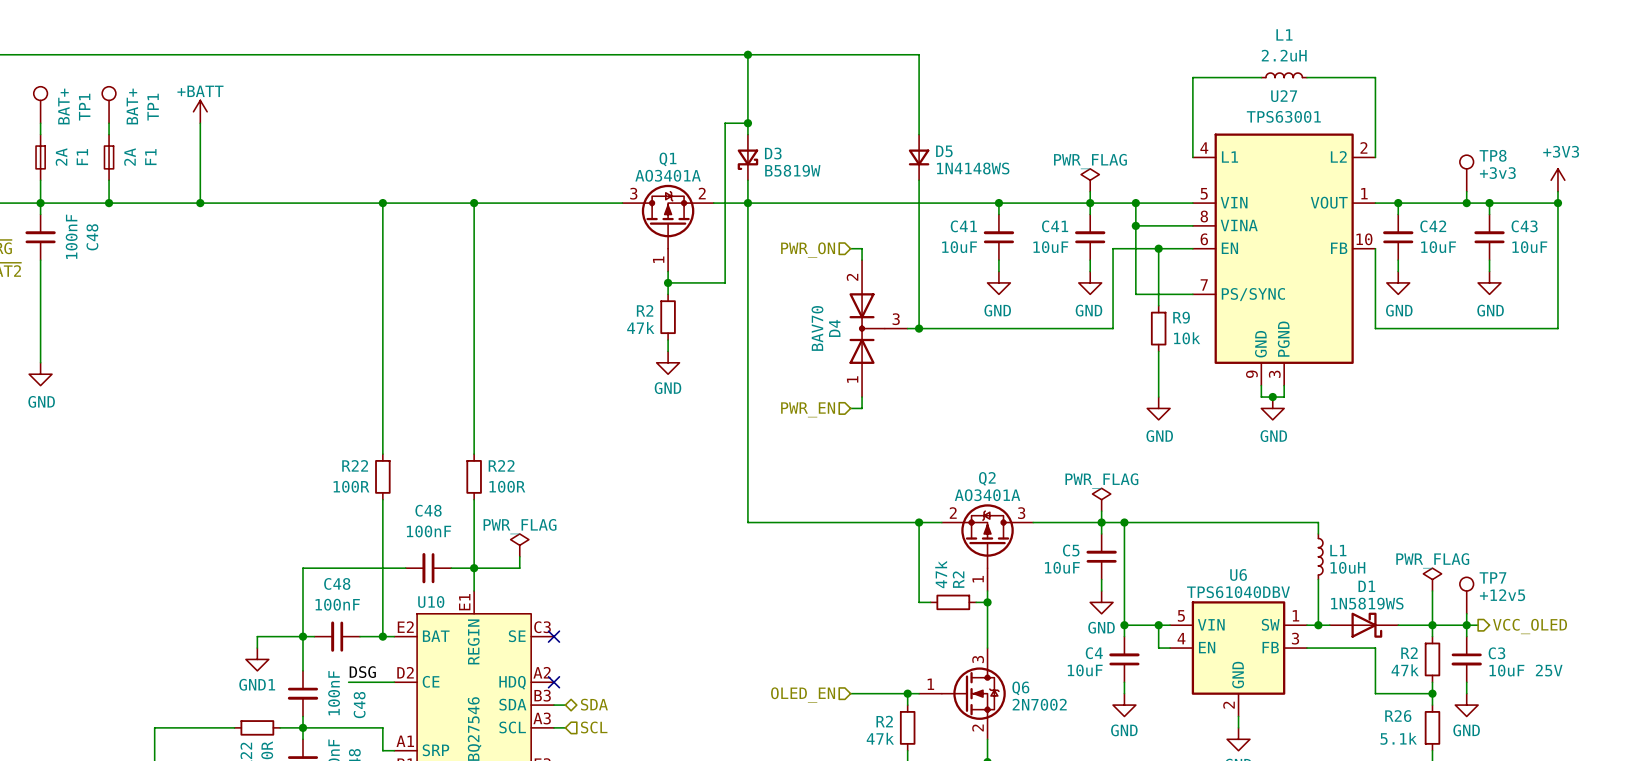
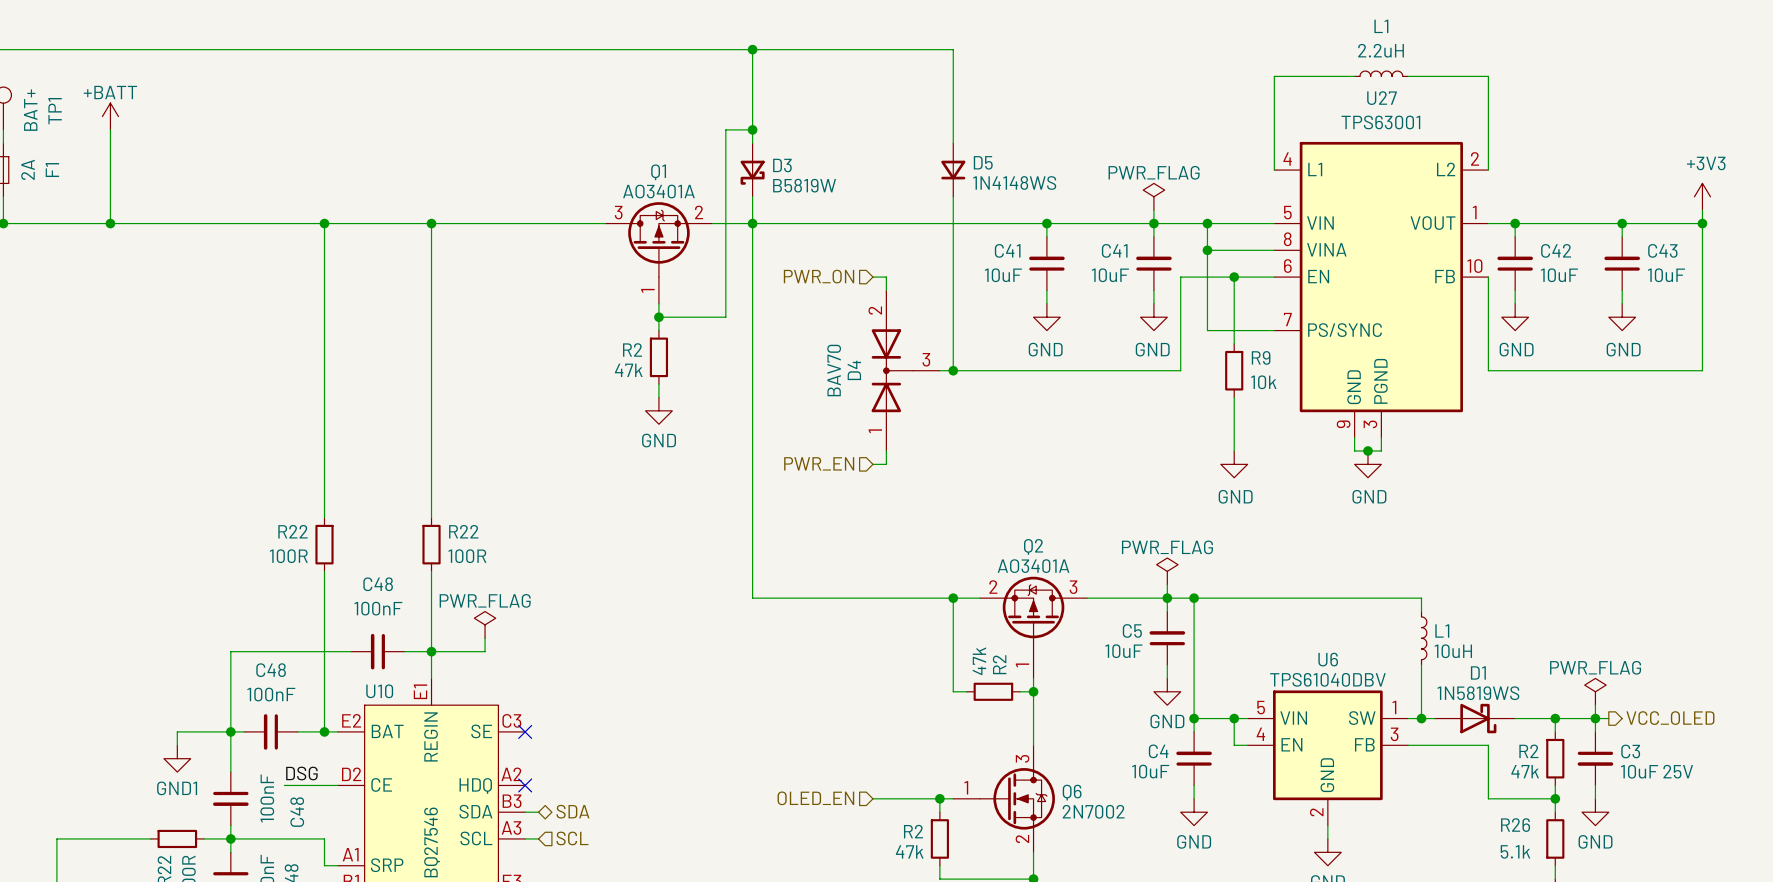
TP8: +3v3 (1466, 173) -> none
wire: (1466, 191) (1466, 203) -> none
junction: (1466, 203) -> none
power symbol position: PWR_FLAG (1432, 579) -> PWR_FLAG (1595, 691)
wire: (1432, 590) (1432, 625) -> none
TP7: +12v5 (1466, 595) -> none

